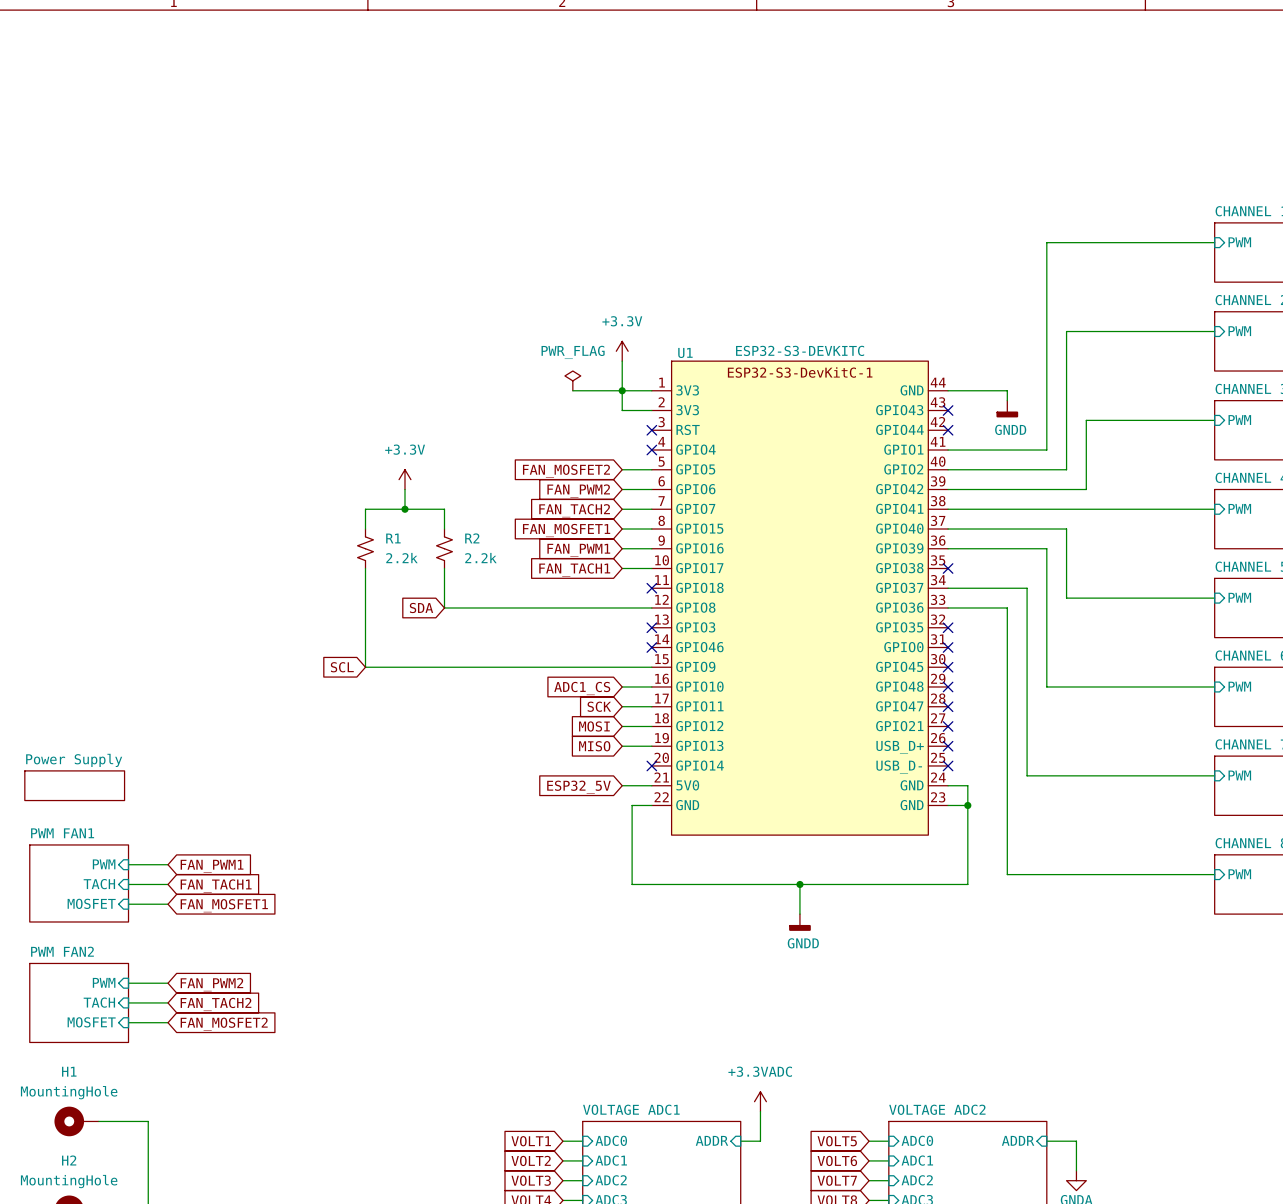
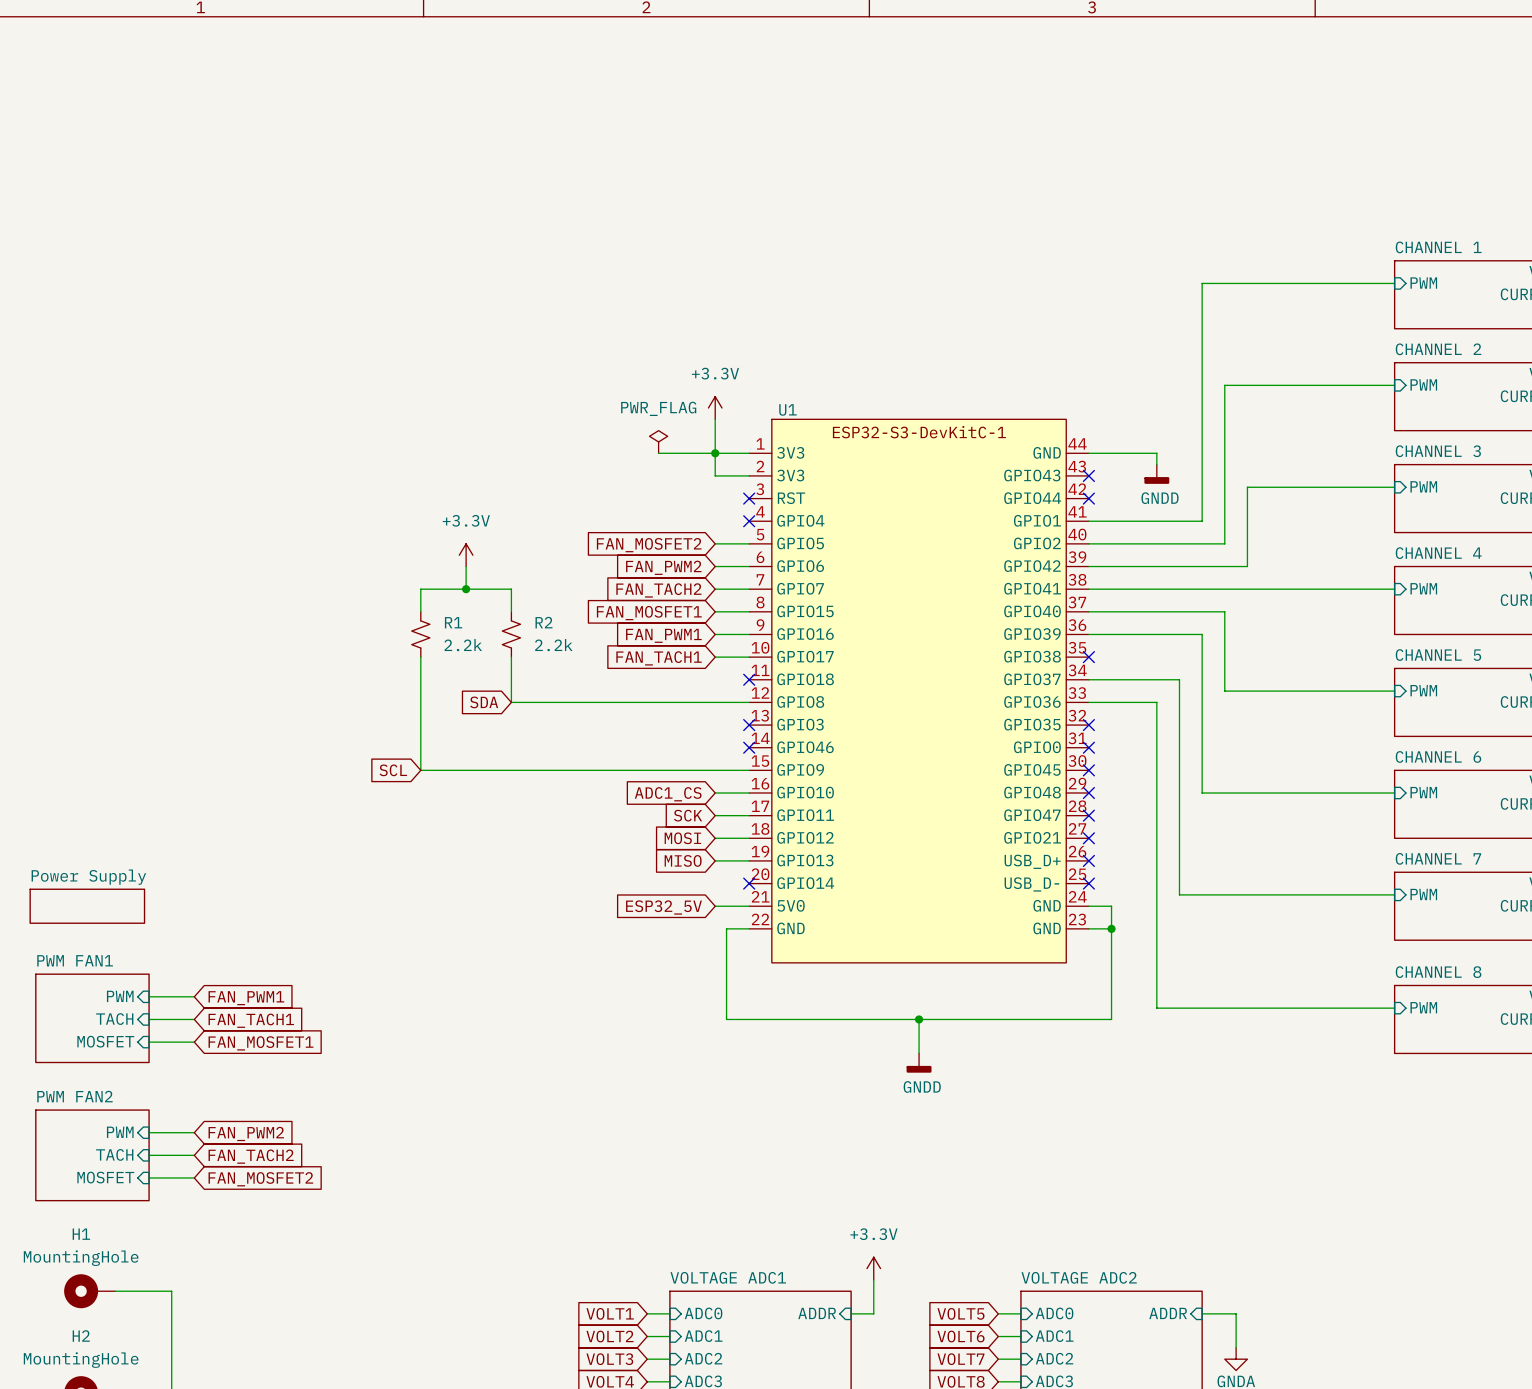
U1 value: ESP32-S3-DEVKITC (800, 350) -> none
power symbol: +3.3VADC (760, 1101) -> +3.3V (873, 1268)

